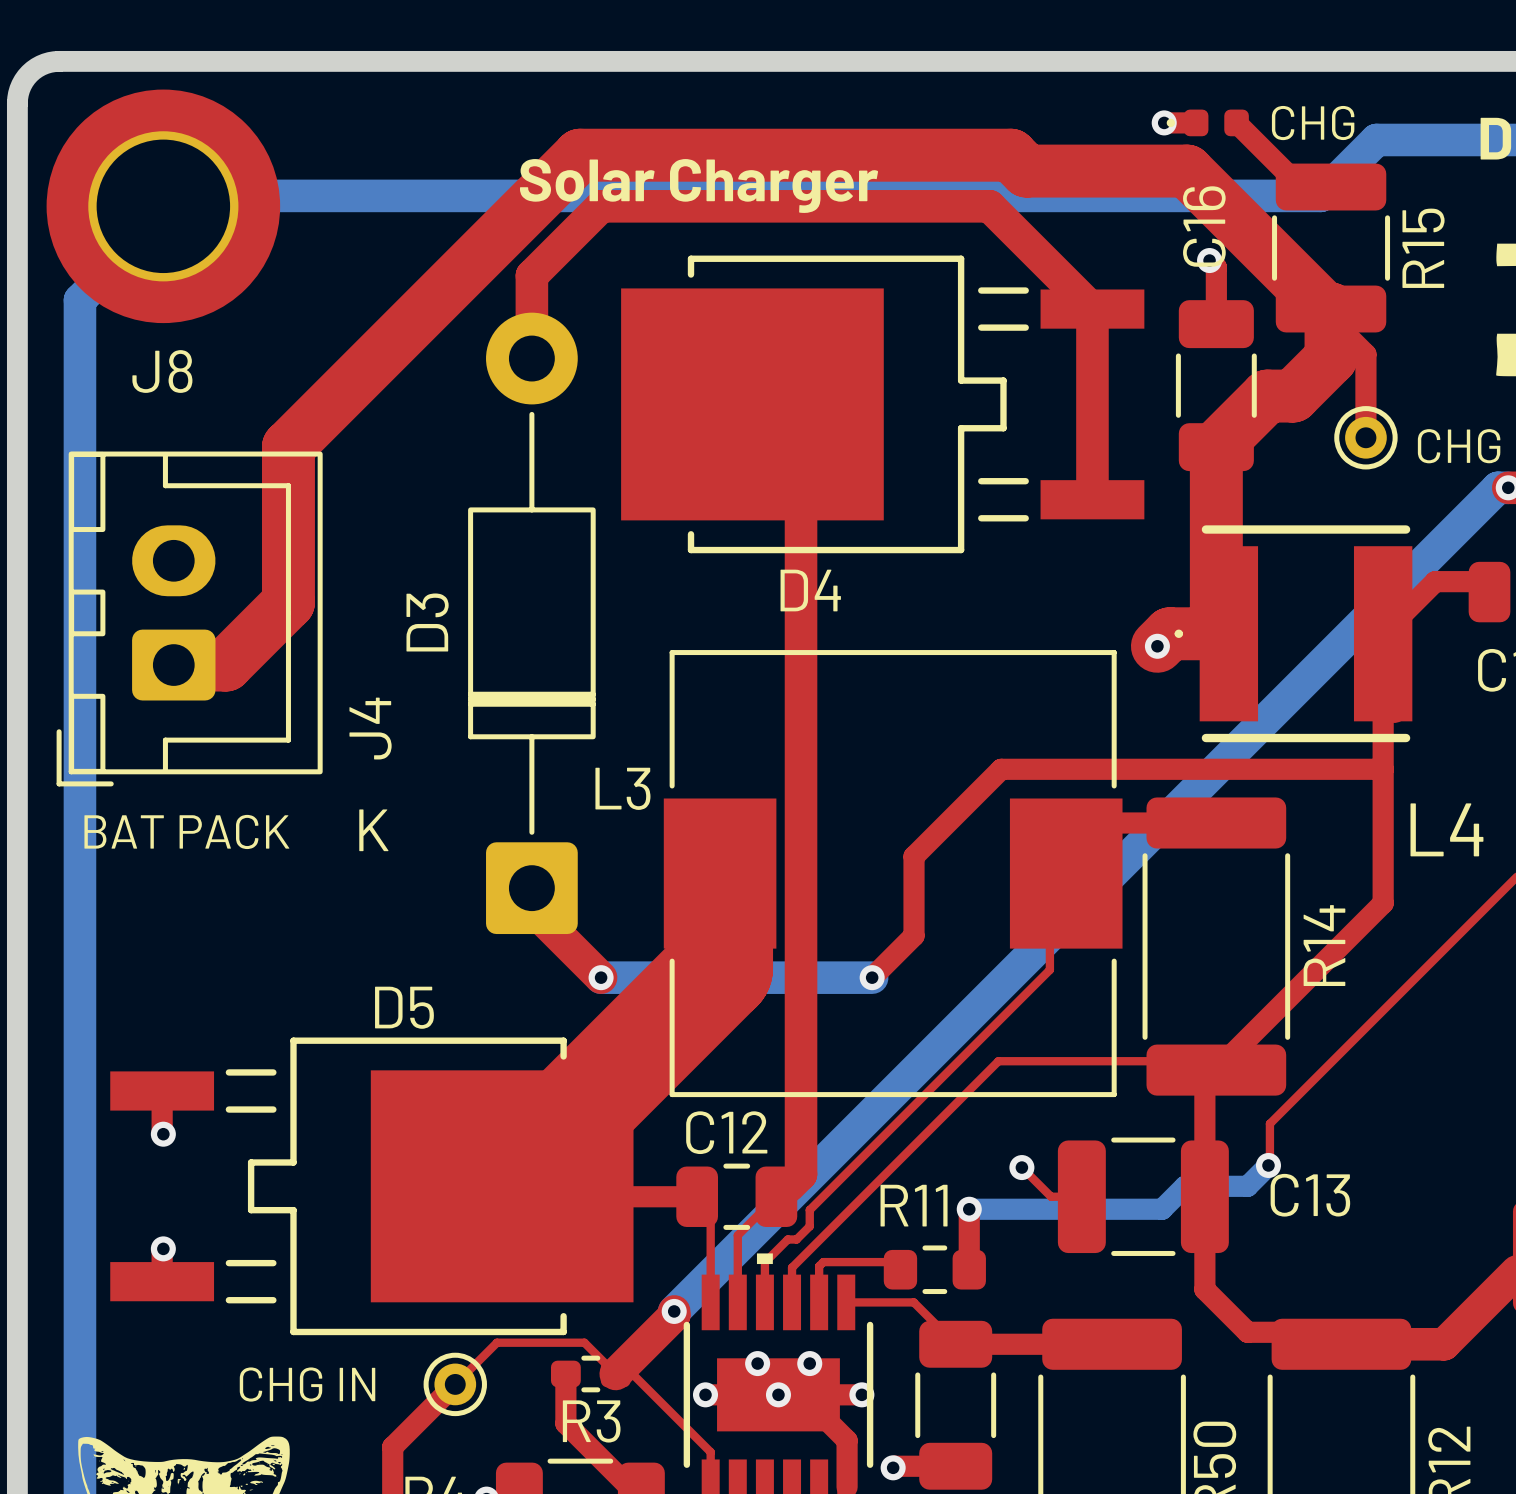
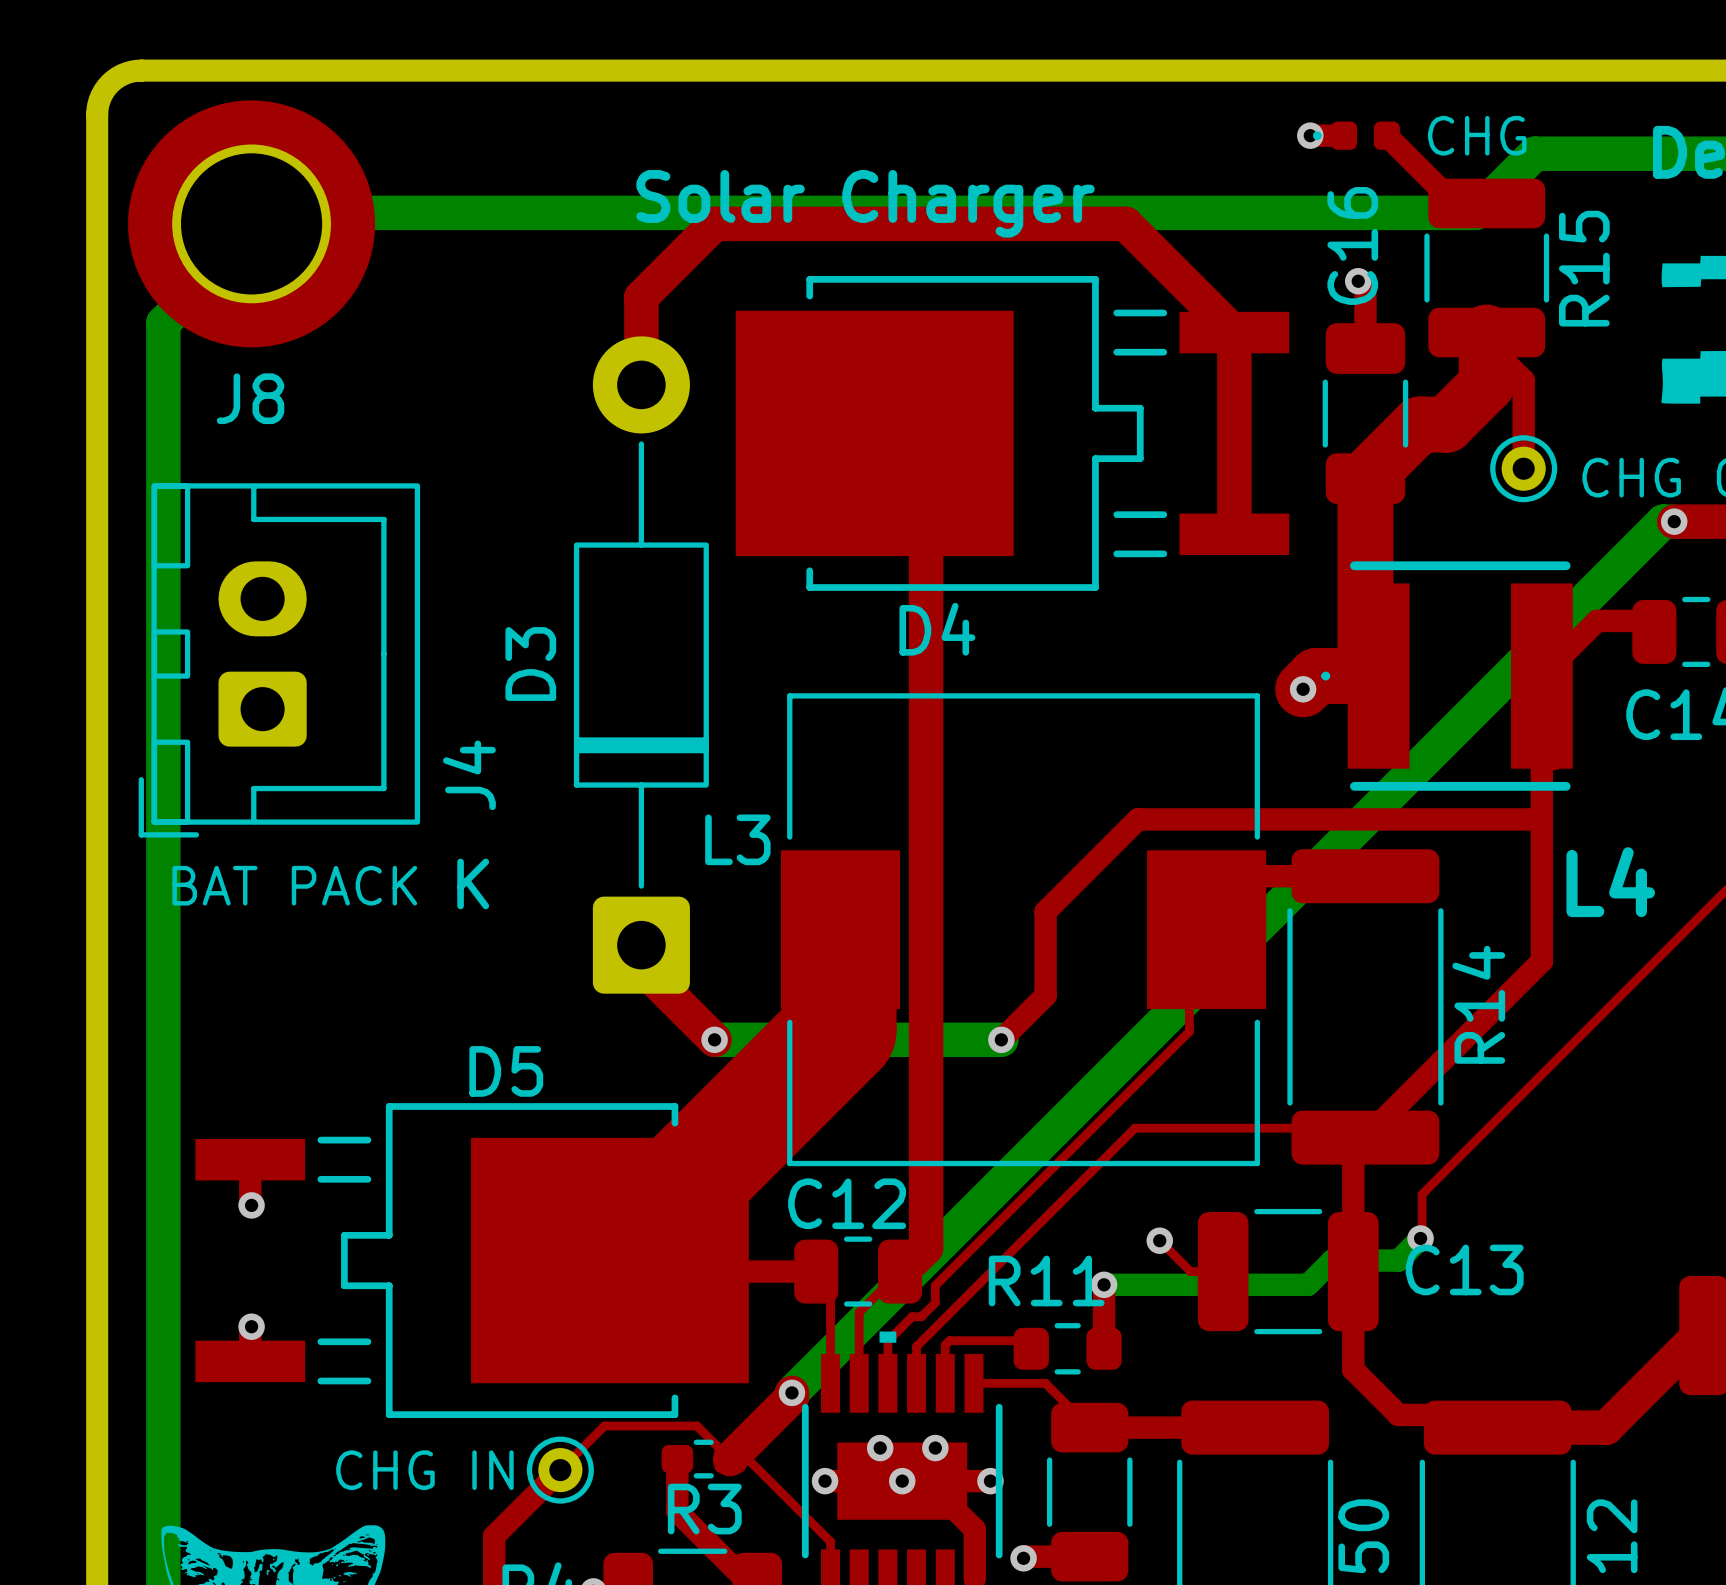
top track: (1331, 309) (1324, 309) (1187, 171) (1026, 171) (1010, 155) (580, 155) (288, 446) (288, 602) (225, 665) (173, 665) -> none

